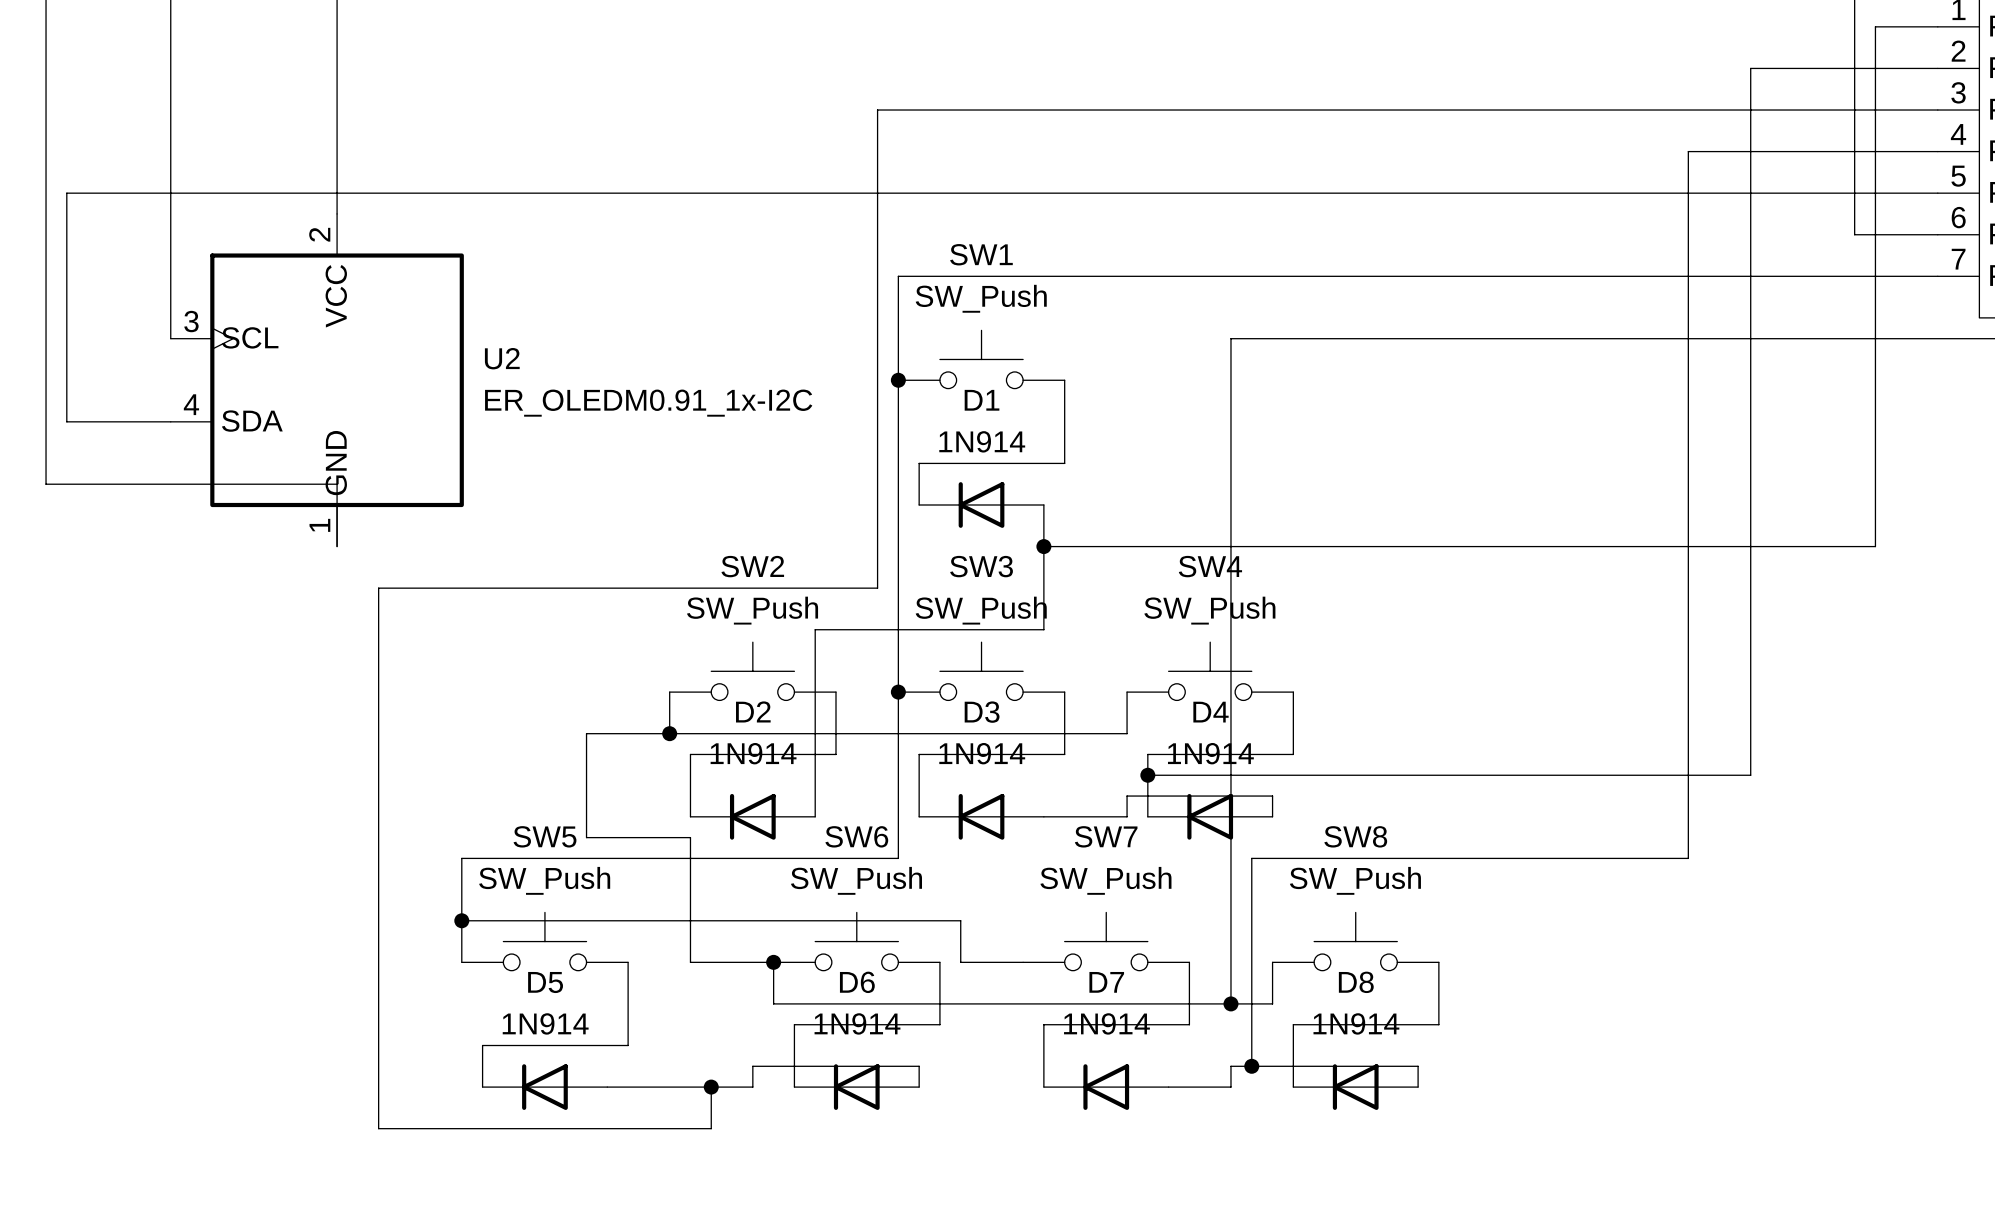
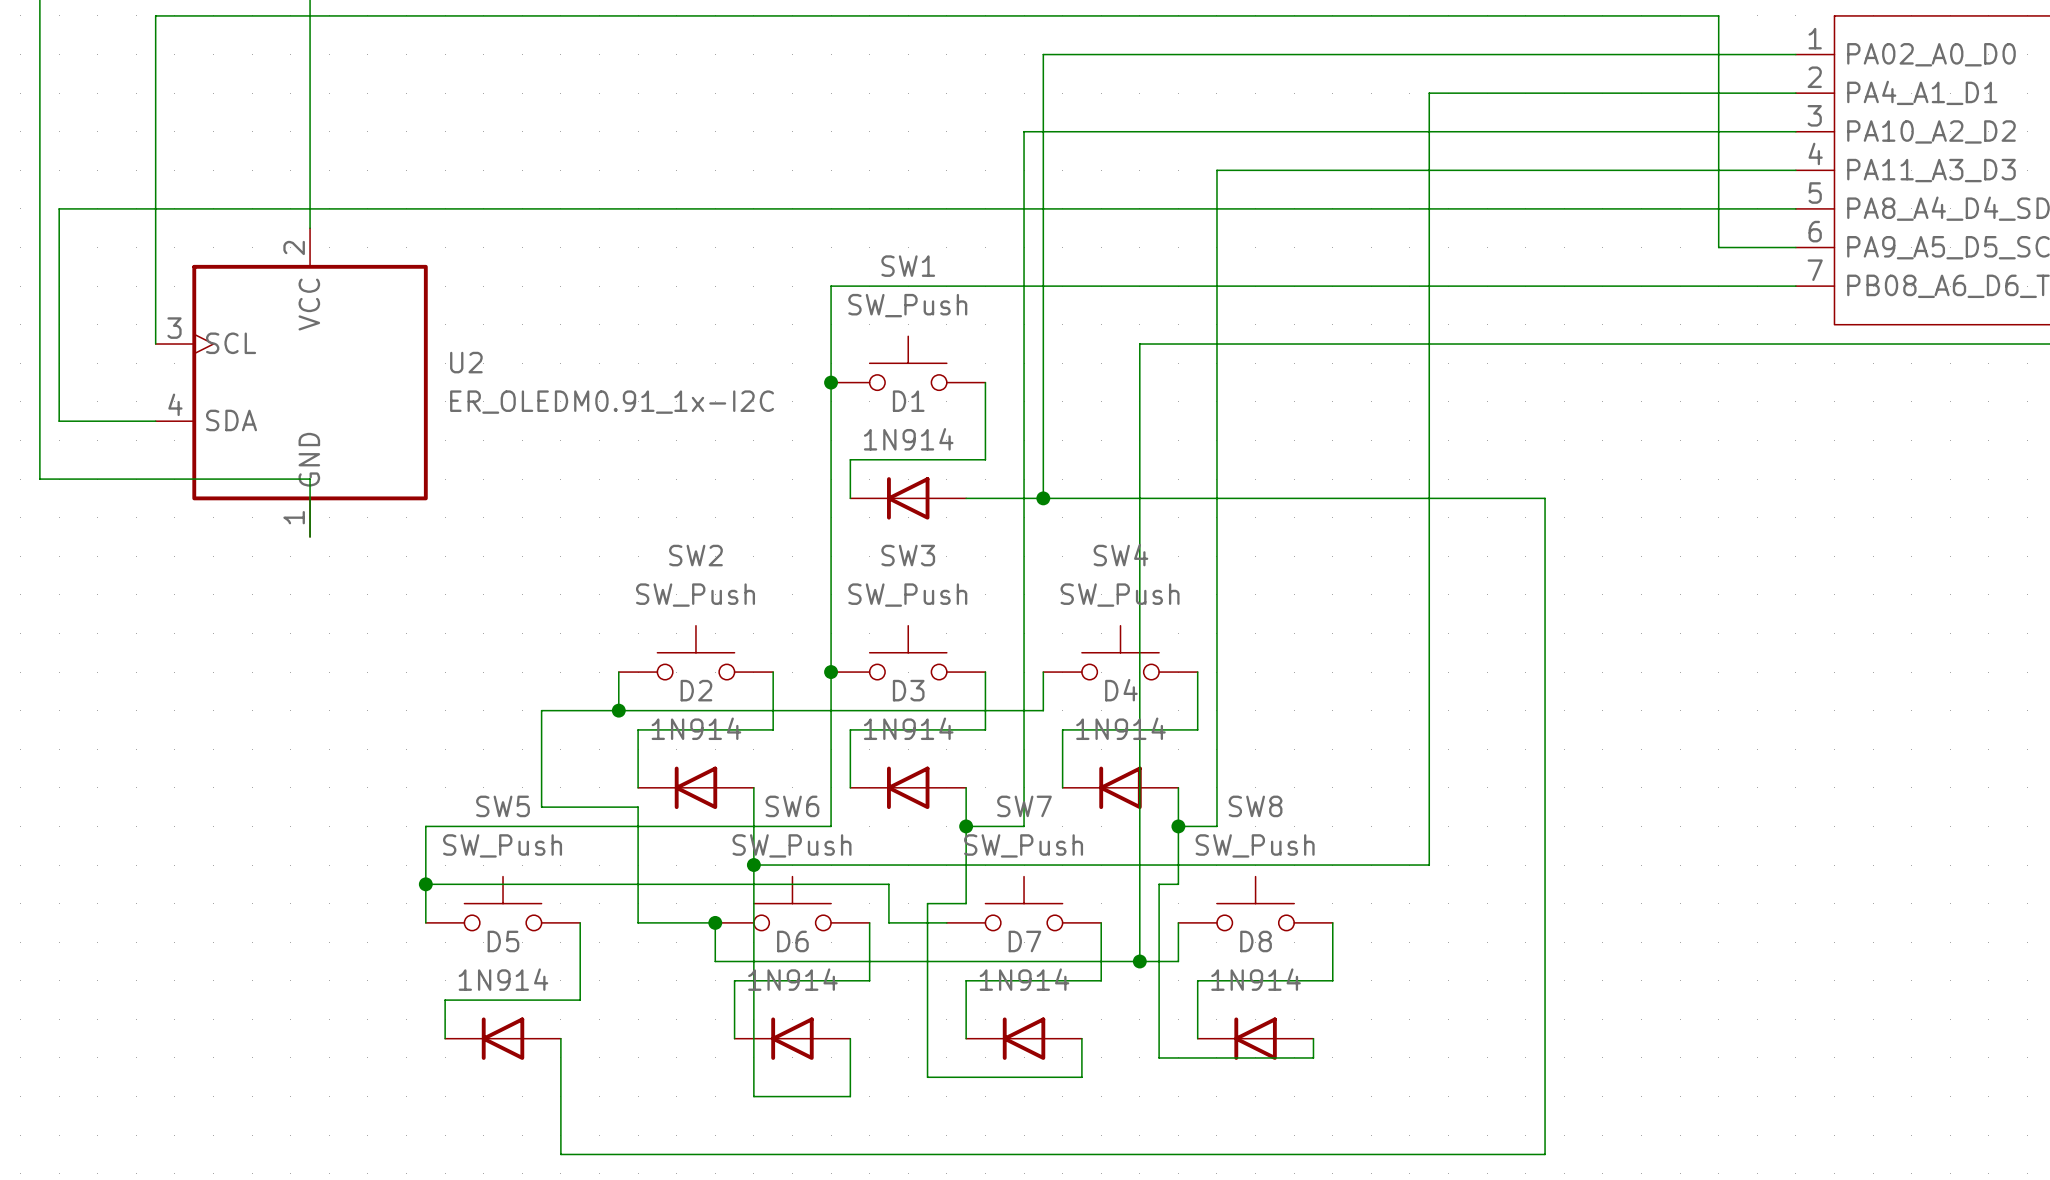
wire: (1875, 26) (1875, 546) (1043, 546) -> (1738, 54) (1043, 54) (1043, 498)
wire: (1750, 68) (1750, 775) (1147, 775) -> (1622, 93) (1429, 93) (1429, 865) (753, 865)
wire: (1106, 110) (877, 110) (877, 588) (378, 588) (378, 1128) (711, 1128) (711, 1087) -> (1024, 131) (1024, 826) (966, 826)
wire: (1688, 151) (1688, 858) (1314, 858) -> (1564, 170) (1216, 170) (1216, 826)
wire: (1043, 504) (1043, 629) (815, 629) (815, 816) -> (966, 498) (1545, 498) (1545, 1154) (560, 1154) (560, 1038)
junction position: (1043, 546) -> (1043, 498)
junction: (1147, 775) -> none
wire: (1043, 816) (1127, 816) (1127, 796) (1272, 796) (1272, 816) -> (966, 787) (966, 903) (927, 903) (927, 1077) (1081, 1077) (1081, 1038)
junction: none -> (966, 826)
wire: (1272, 858) (1251, 858) (1251, 920) -> (1178, 787) (1178, 884) (1159, 884)
junction: none -> (1178, 826)
junction: none -> (753, 865)
junction: (1251, 1066) -> none
wire: (607, 1087) (752, 1087) (752, 1066) (919, 1066) (919, 1087) -> (753, 787) (753, 1096) (850, 1096) (850, 1038)
junction: (711, 1087) -> none
wire: (1168, 1087) (1230, 1087) (1230, 1066) (1418, 1066) (1418, 1087) -> (1159, 1019) (1159, 1057) (1313, 1057) (1313, 1038)

